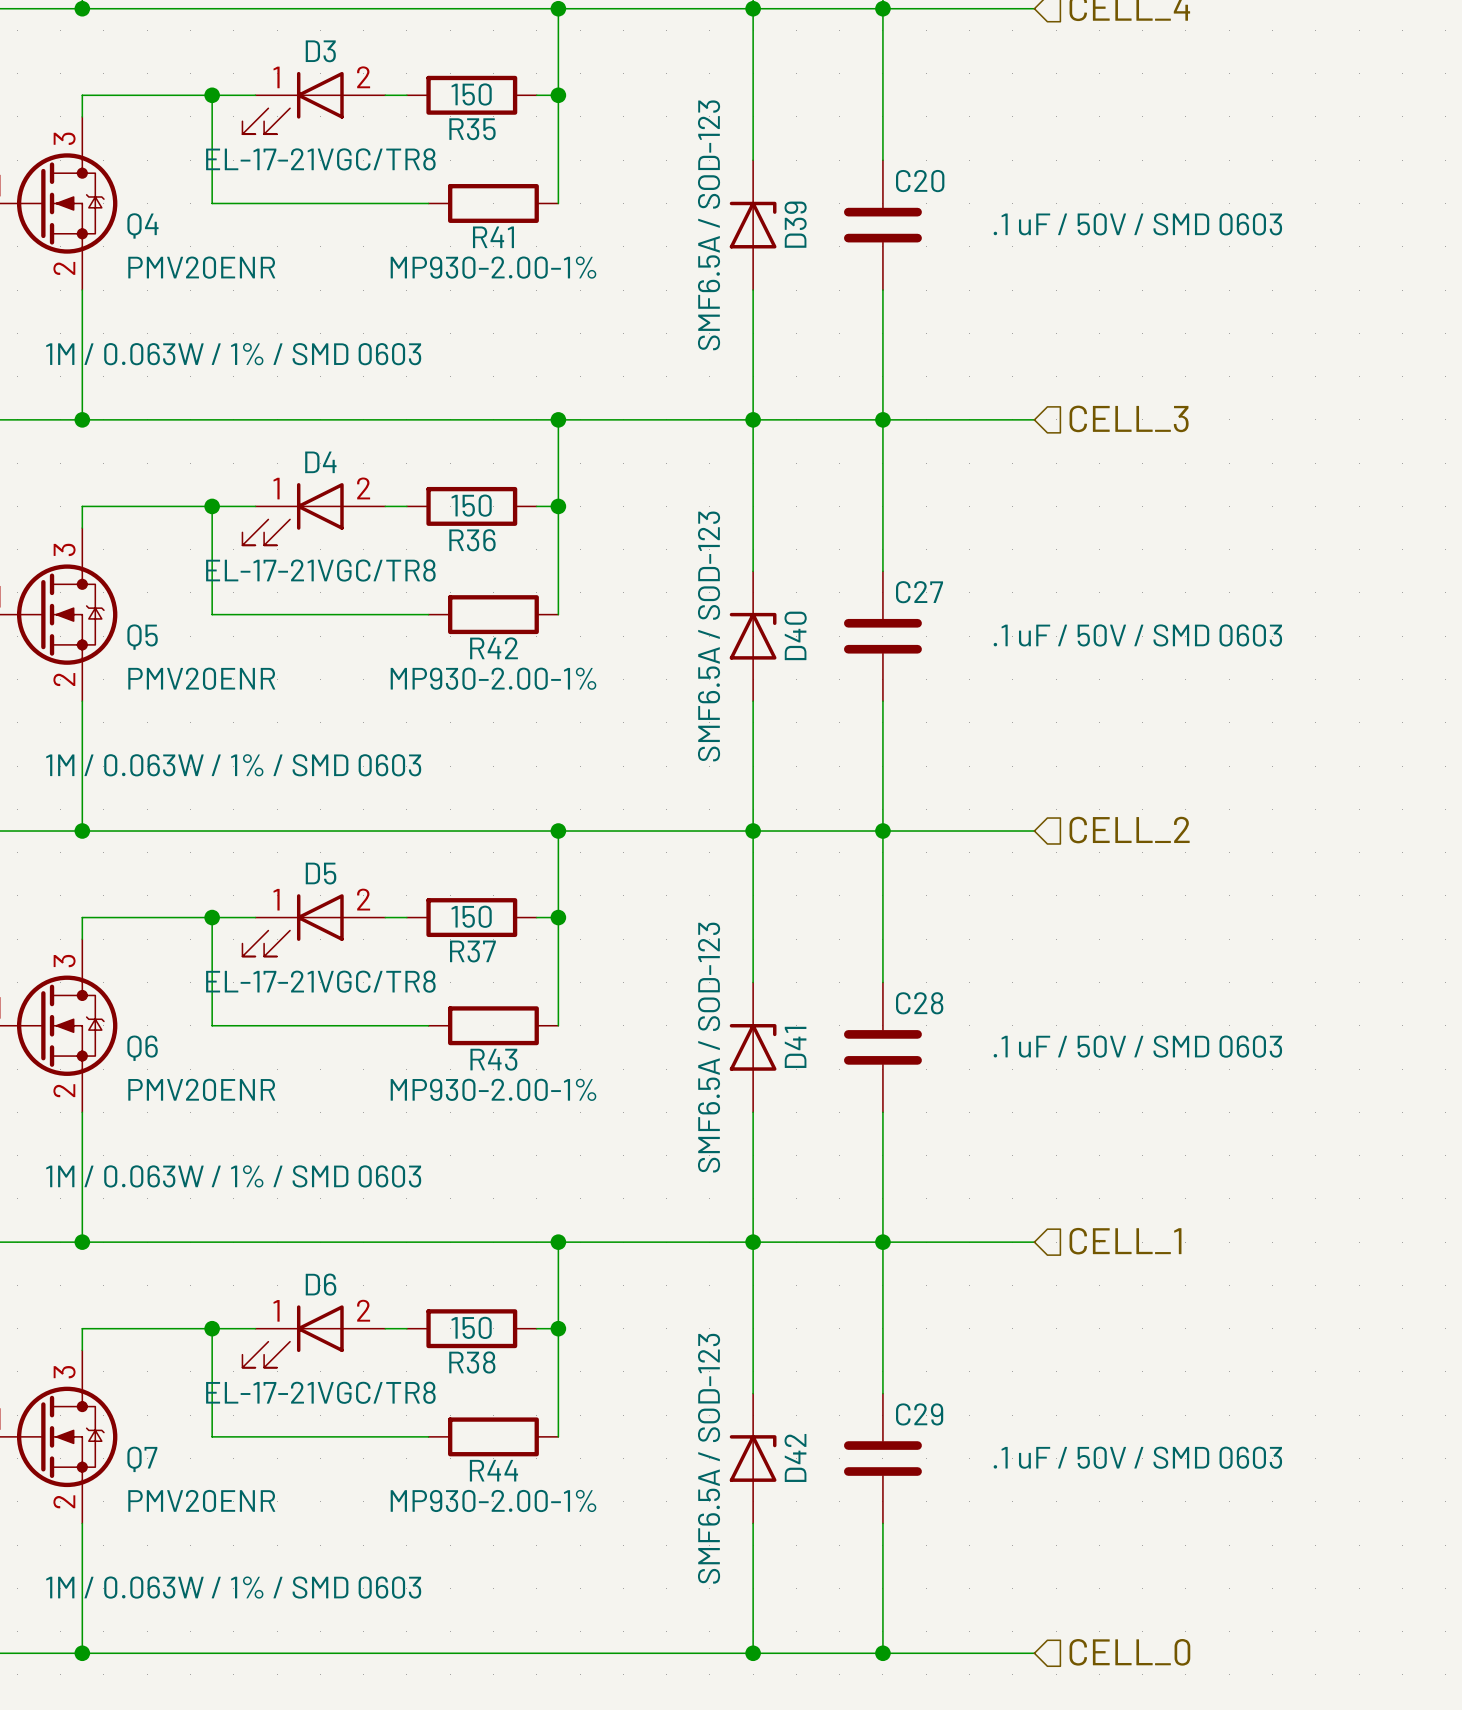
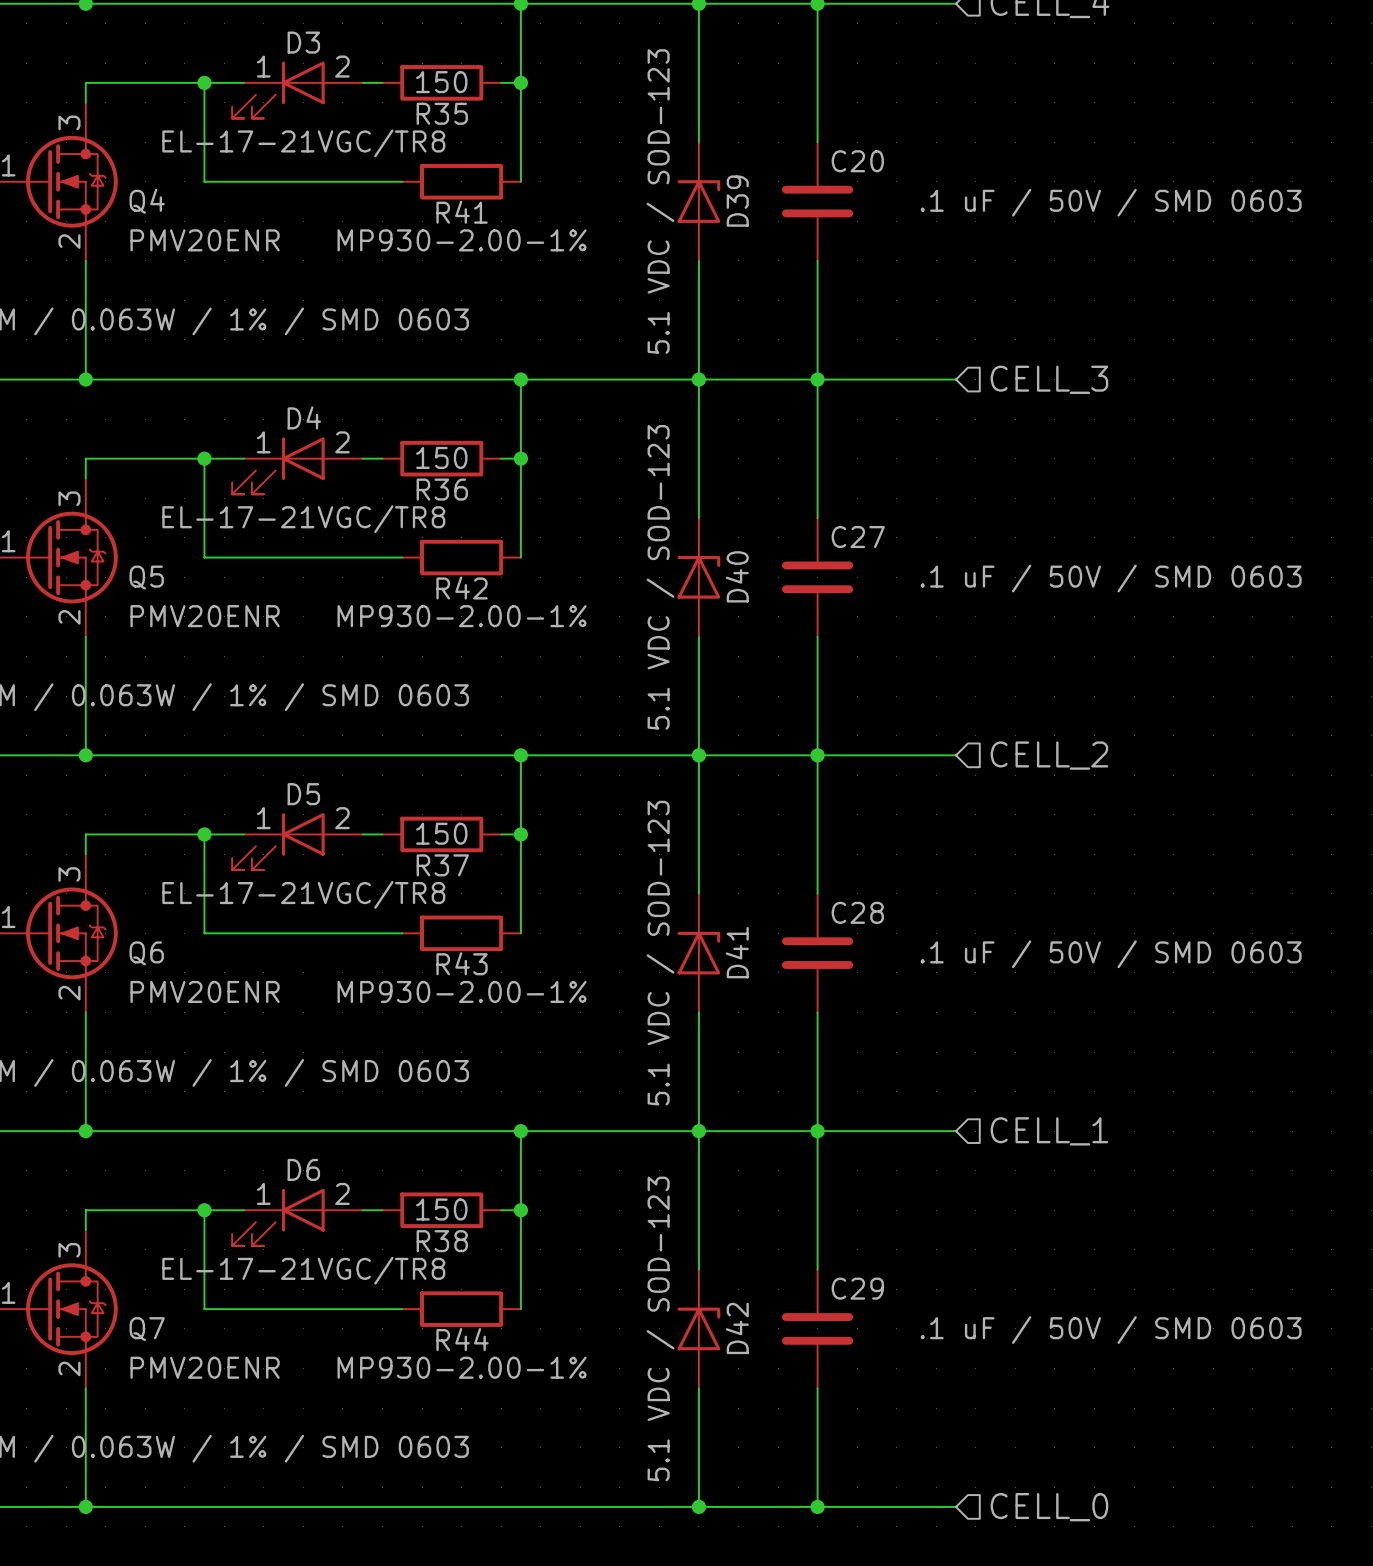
D39 value: SMF6.5A / SOD-123 (709, 225) -> 5.1 VDC / SOD-123 (660, 201)
D40 value: SMF6.5A / SOD-123 (709, 636) -> 5.1 VDC / SOD-123 (660, 577)
D41 value: SMF6.5A / SOD-123 (709, 1047) -> 5.1 VDC / SOD-123 (660, 953)
D42 value: SMF6.5A / SOD-123 (709, 1458) -> 5.1 VDC / SOD-123 (660, 1328)

